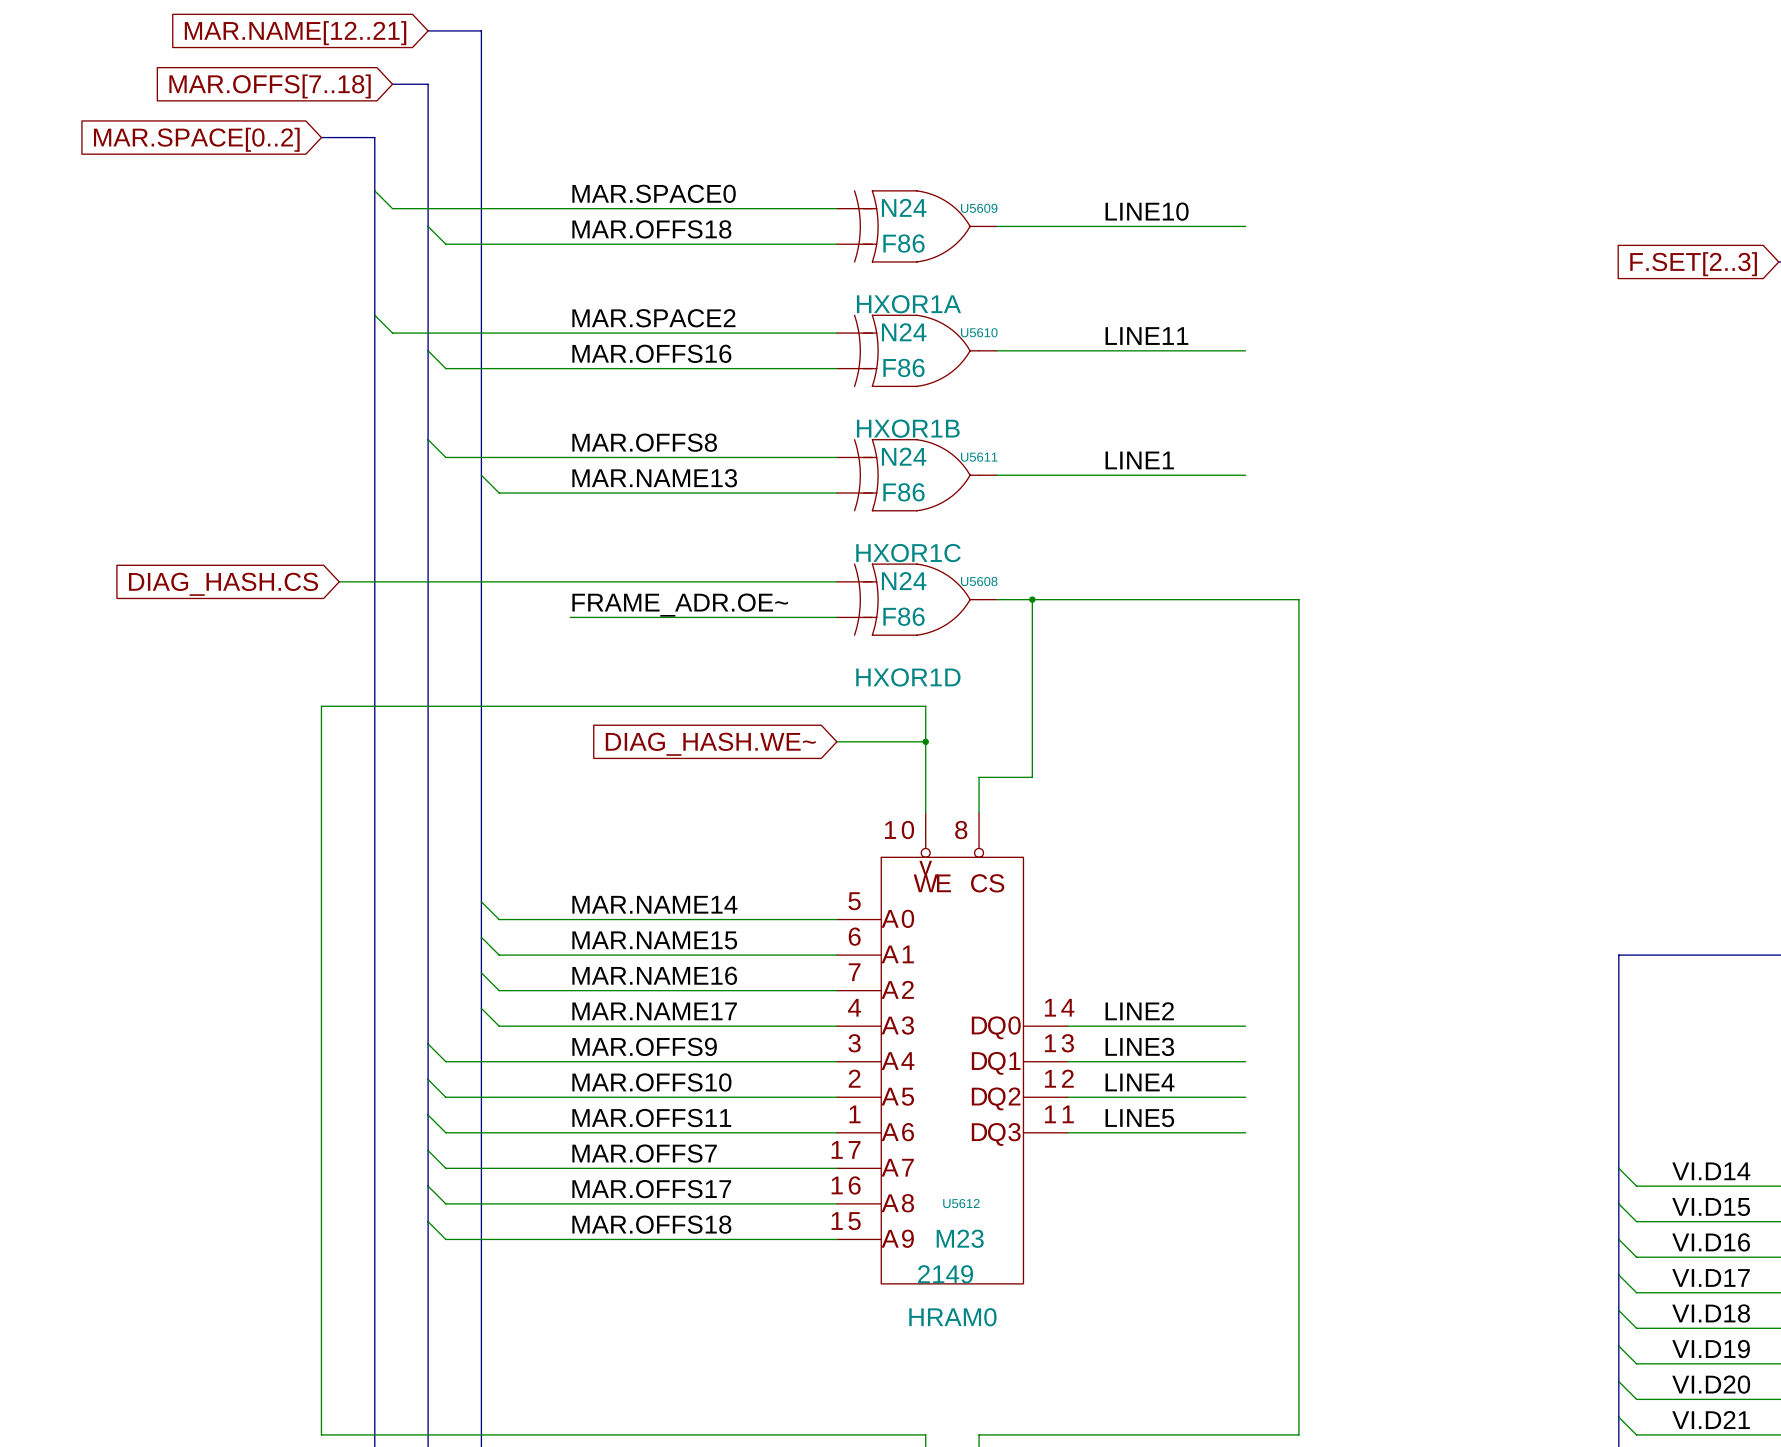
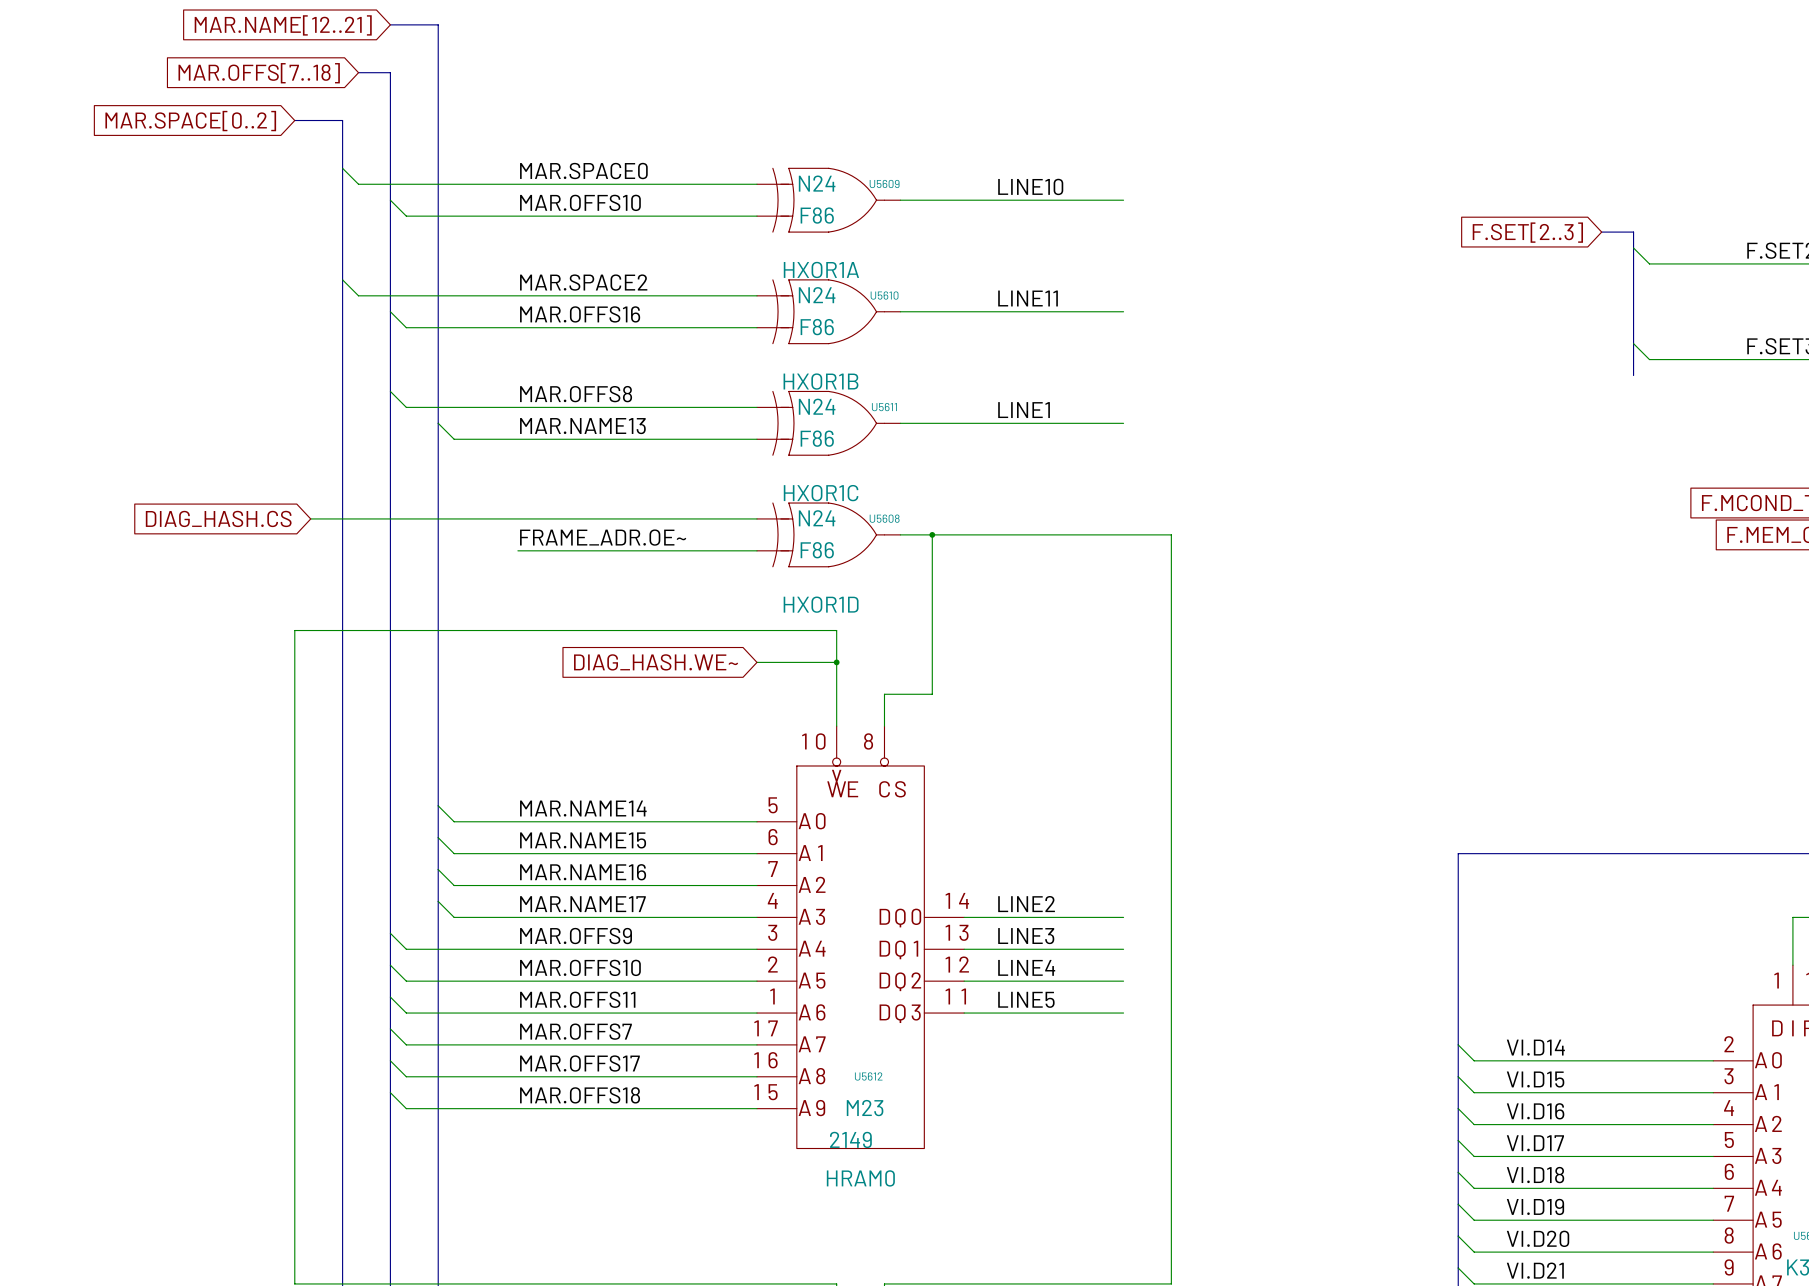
label: MAR.OFFS18 (651, 229) -> MAR.OFFS10 (580, 202)

